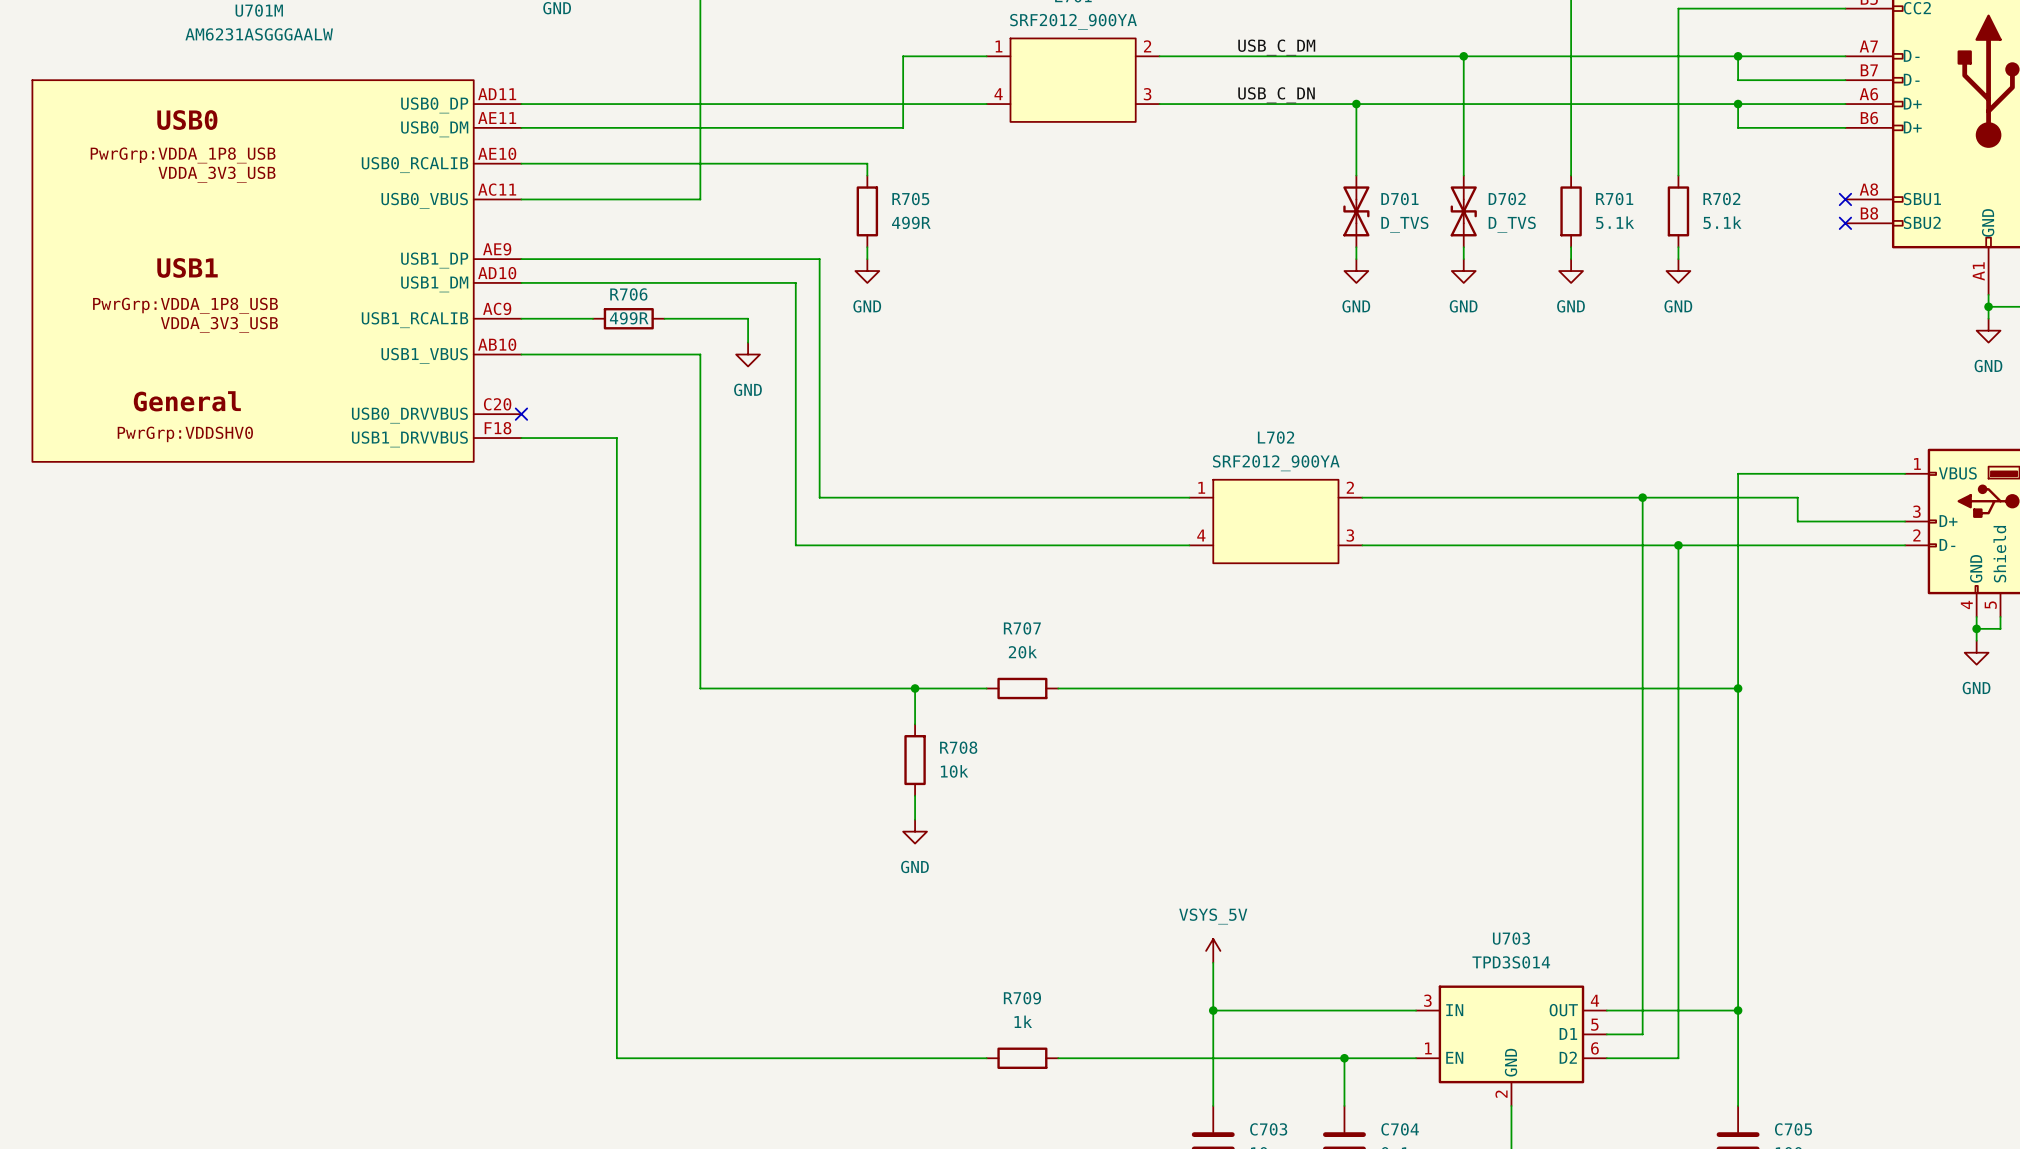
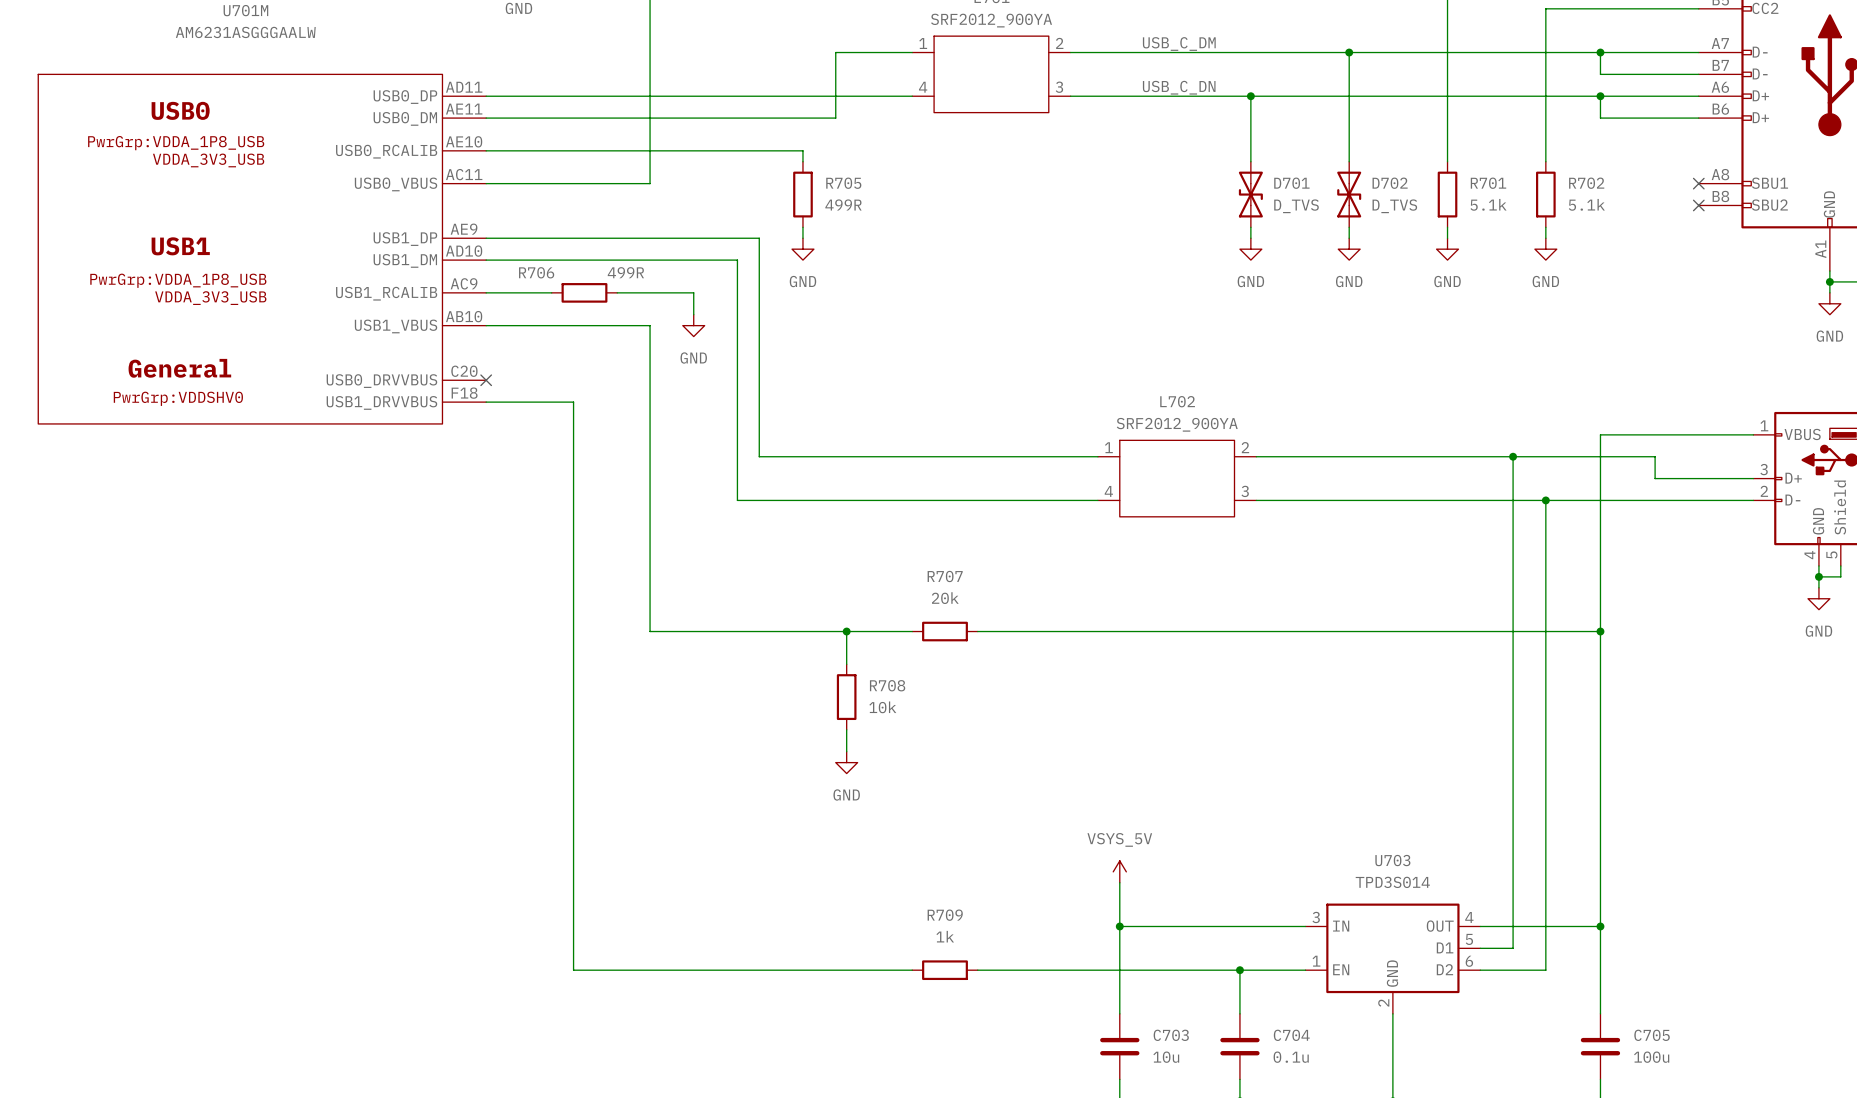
R706 name position: R706 (628, 294) -> R706 (536, 272)
R706 value position: 499R (629, 318) -> 499R (625, 272)

